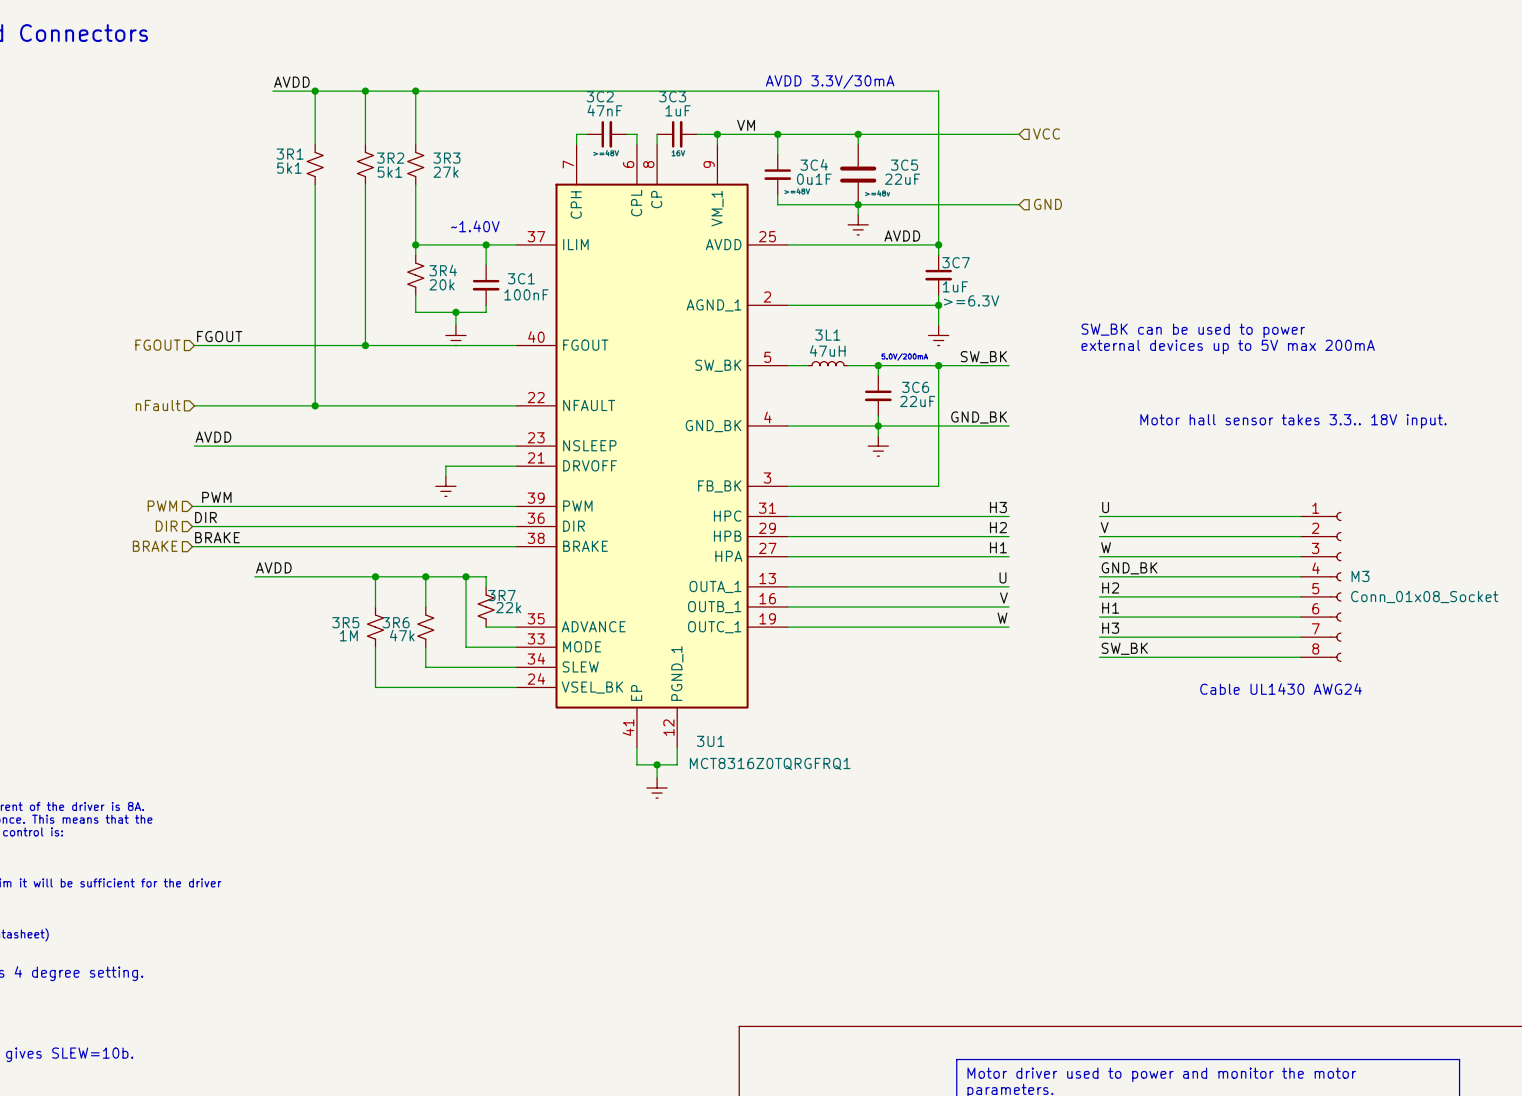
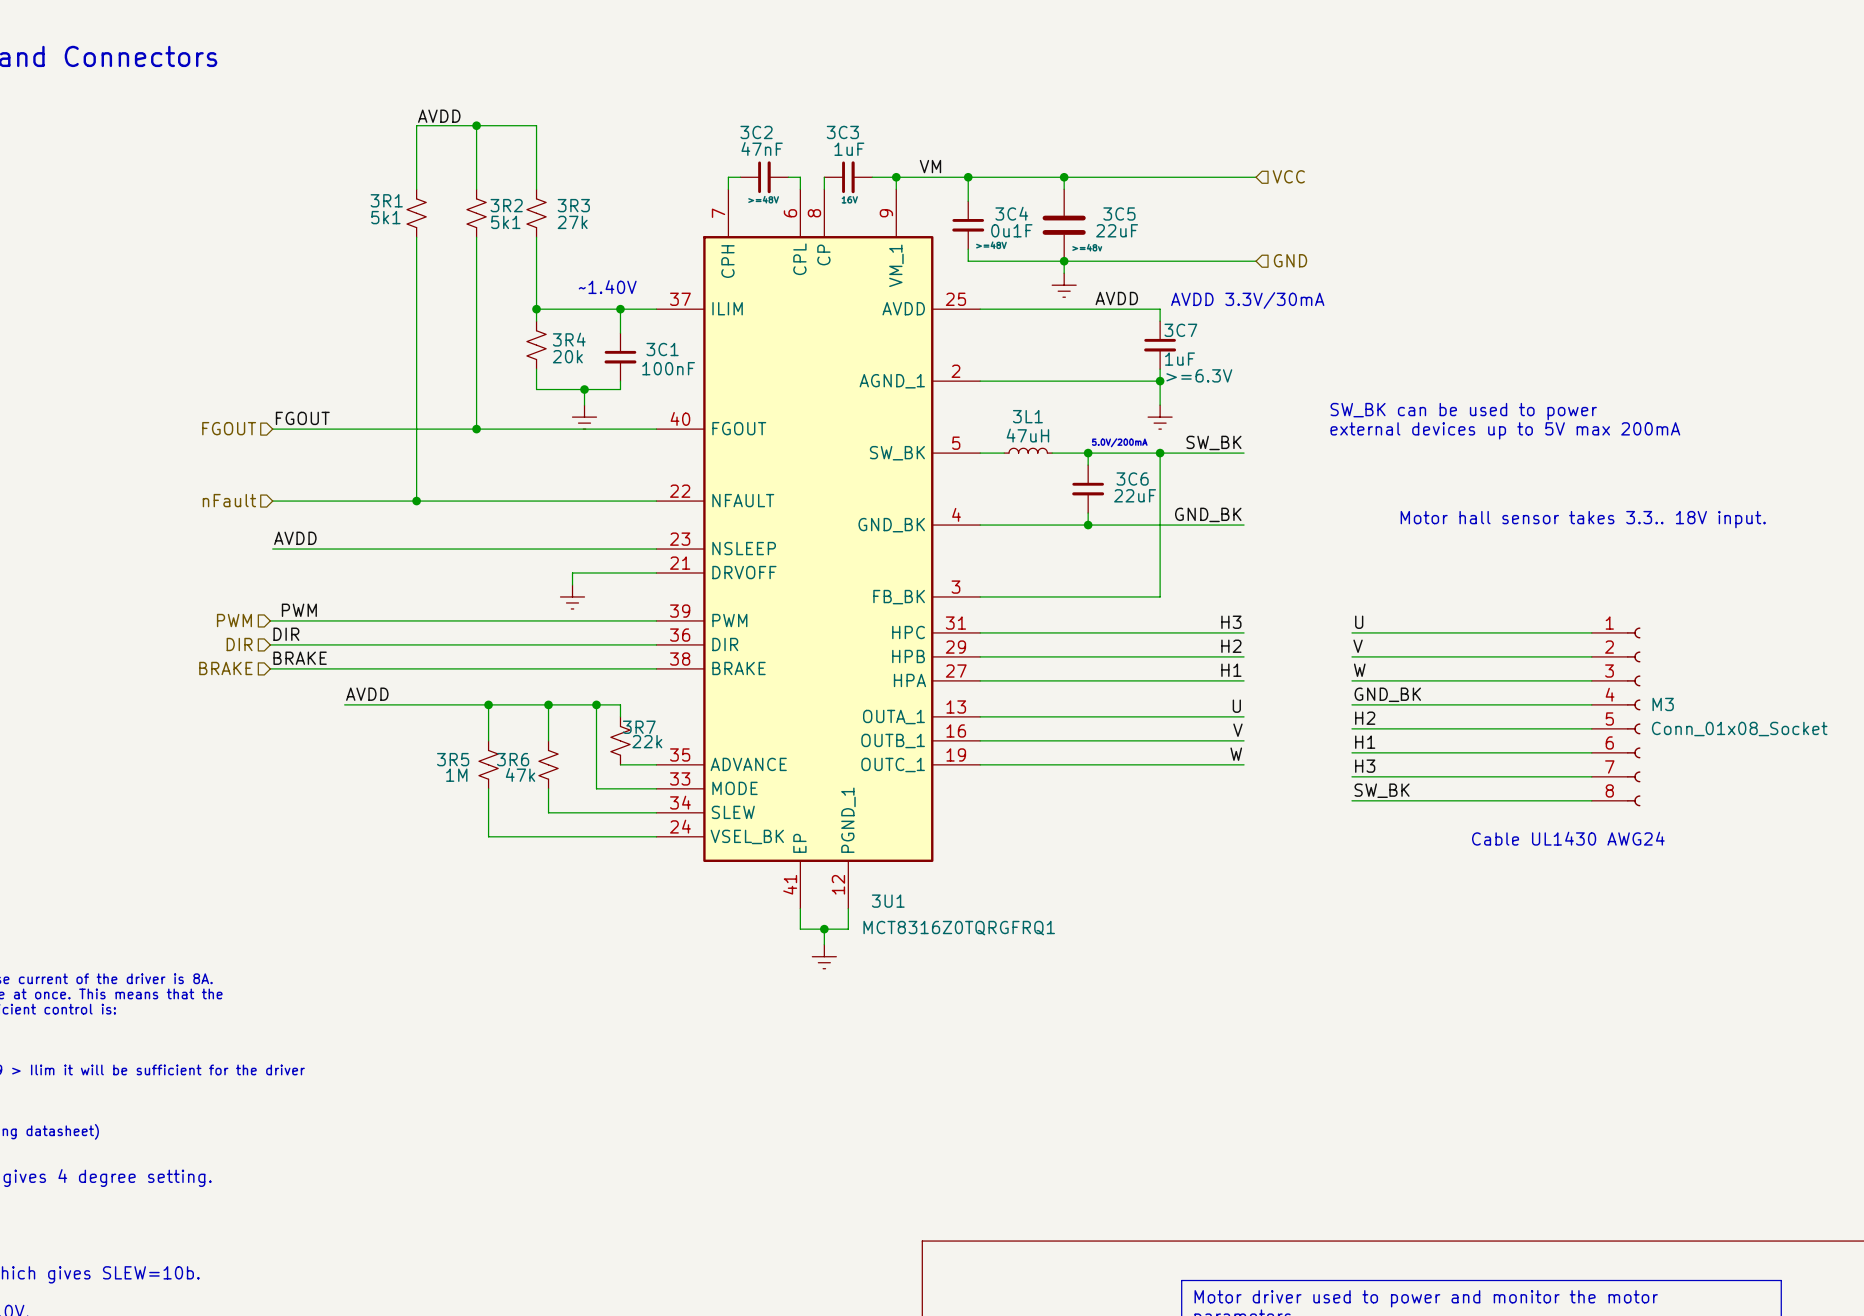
text: AVDD 3.3V/30mA (830, 81) -> none
label position: AVDD (291, 82) -> AVDD (439, 116)
wire: (272, 91) (315, 91) -> none
junction: (315, 91) -> none
wire: (415, 91) (938, 91) (938, 244) -> none
junction: (415, 91) -> none
text: none -> AVDD 3.3V/30mA (1247, 300)
junction: (938, 244) -> none
wire: (878, 425) (878, 436) -> none
power symbol: (878, 446) -> none

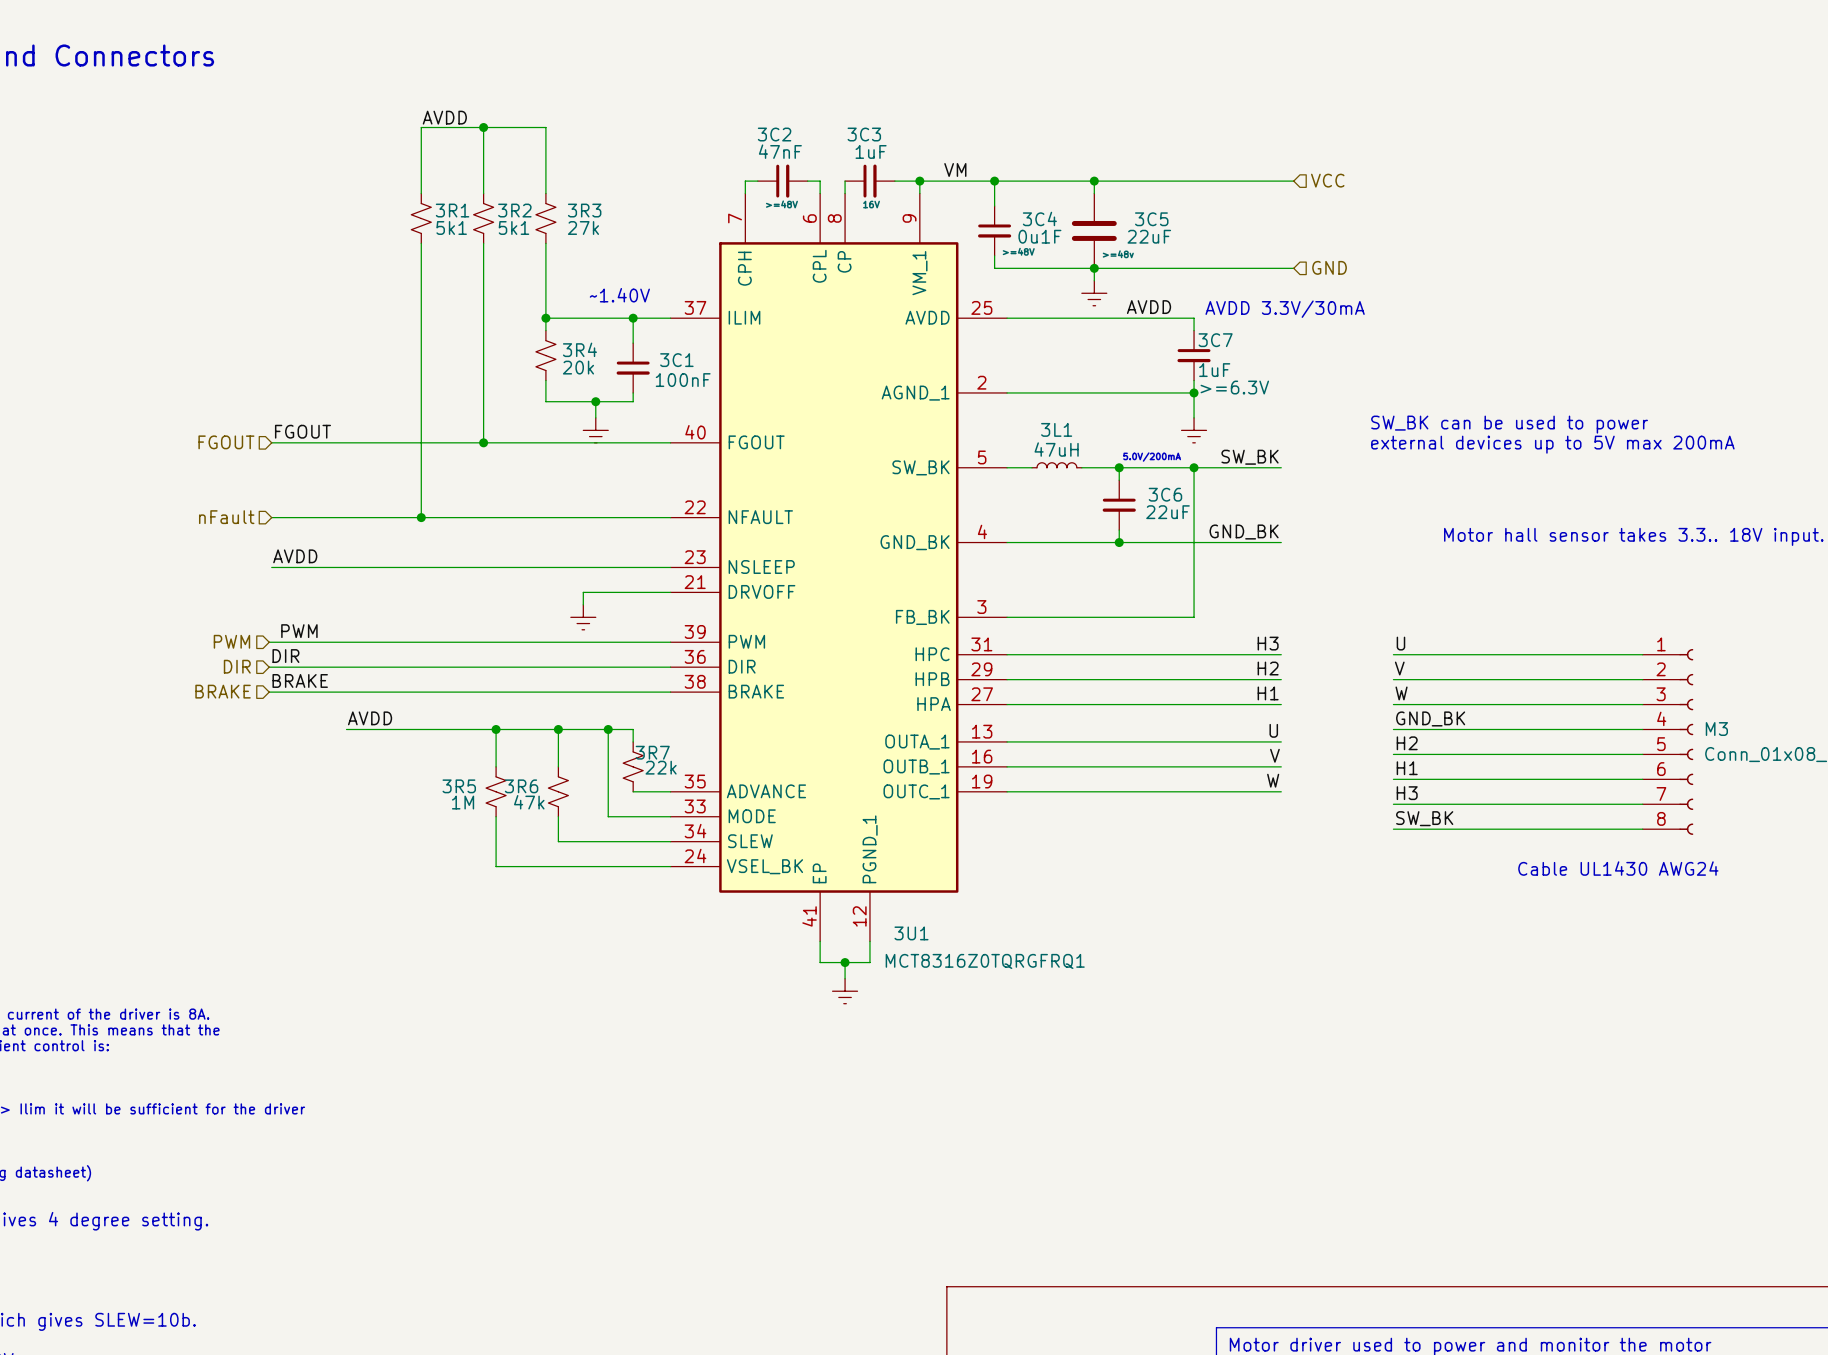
3R1 name position: 3R1 (386, 200) -> 3R1 (452, 210)
3R1 value position: 5k1 (385, 217) -> 5k1 (451, 227)

